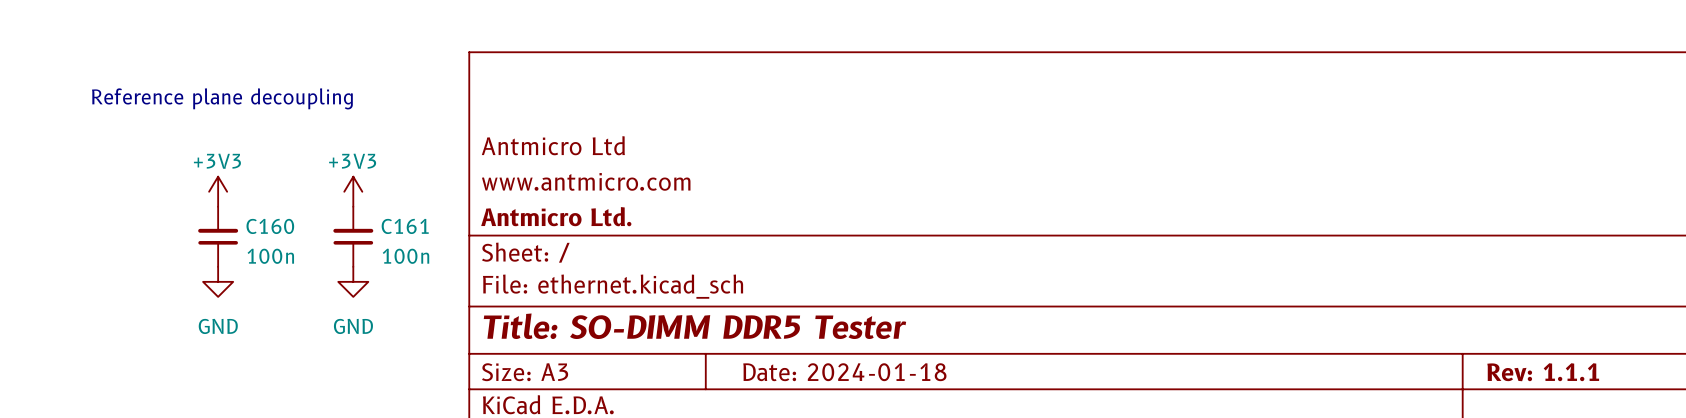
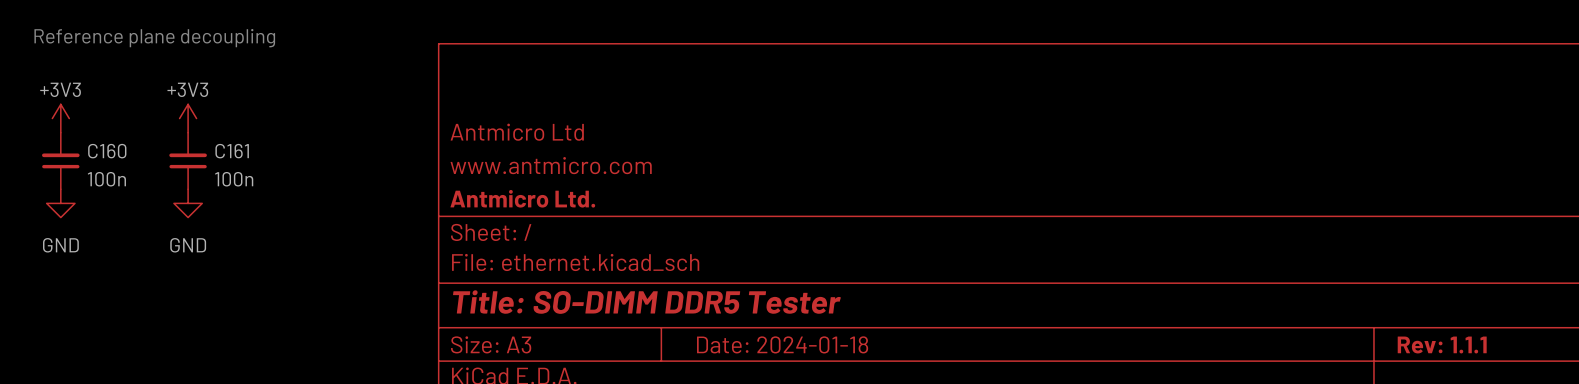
text position: Reference plane decoupling (222, 98) -> Reference plane decoupling (154, 38)
power symbol: none -> +3V3 (60, 118)
power symbol position: +3V3 (218, 191) -> +3V3 (188, 118)
power symbol: +3V3 (353, 191) -> none
power symbol: none -> GND (60, 203)
C160 position: (218, 236) -> (60, 160)
C161 position: (353, 236) -> (188, 160)
power symbol position: GND (218, 281) -> GND (188, 203)
power symbol: GND (353, 281) -> none

